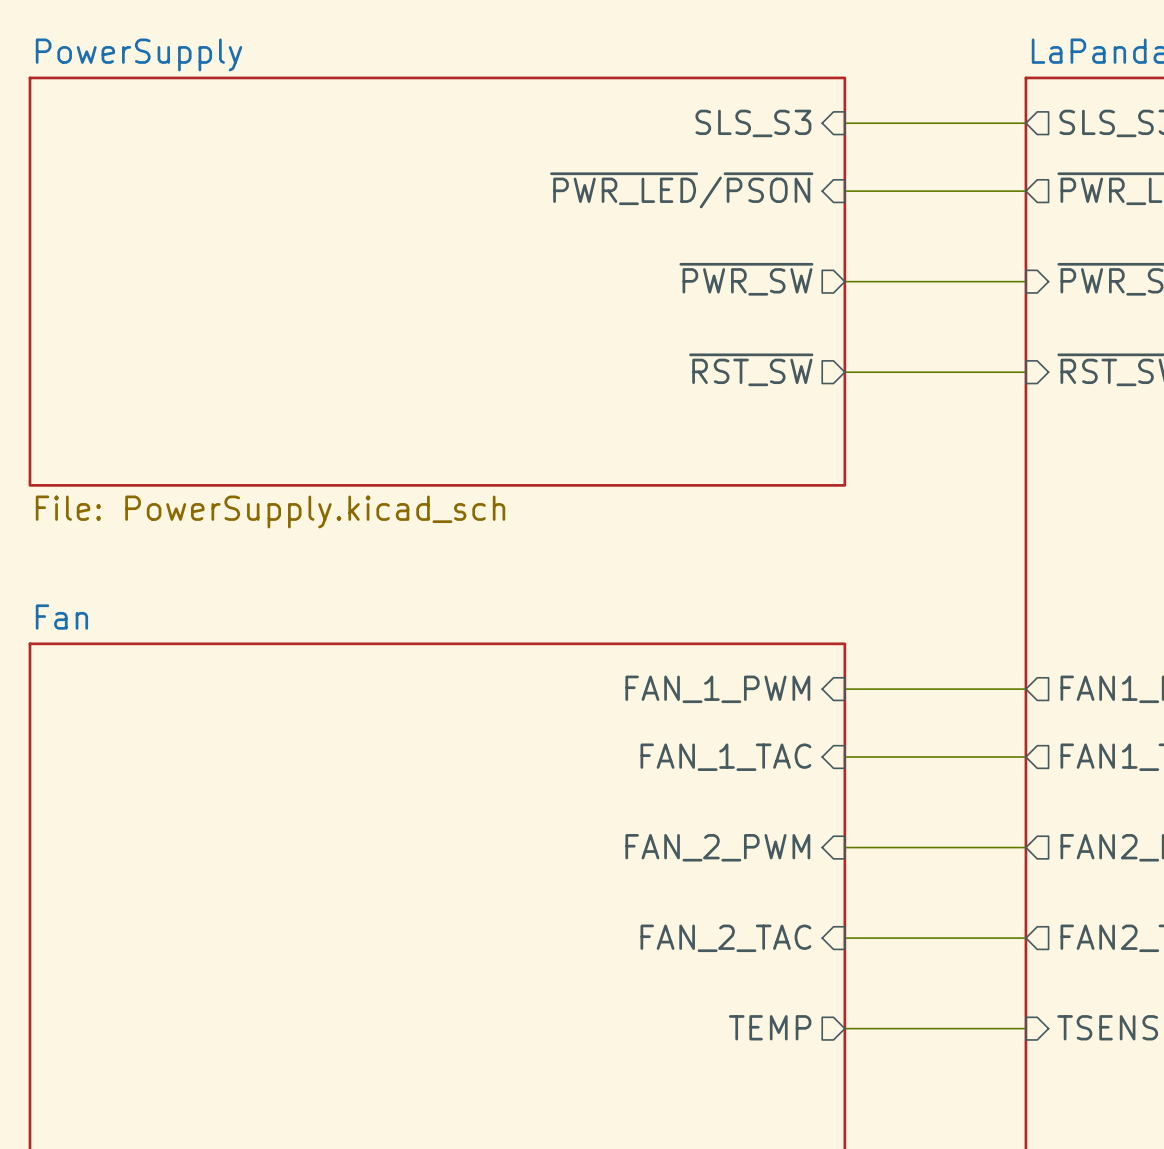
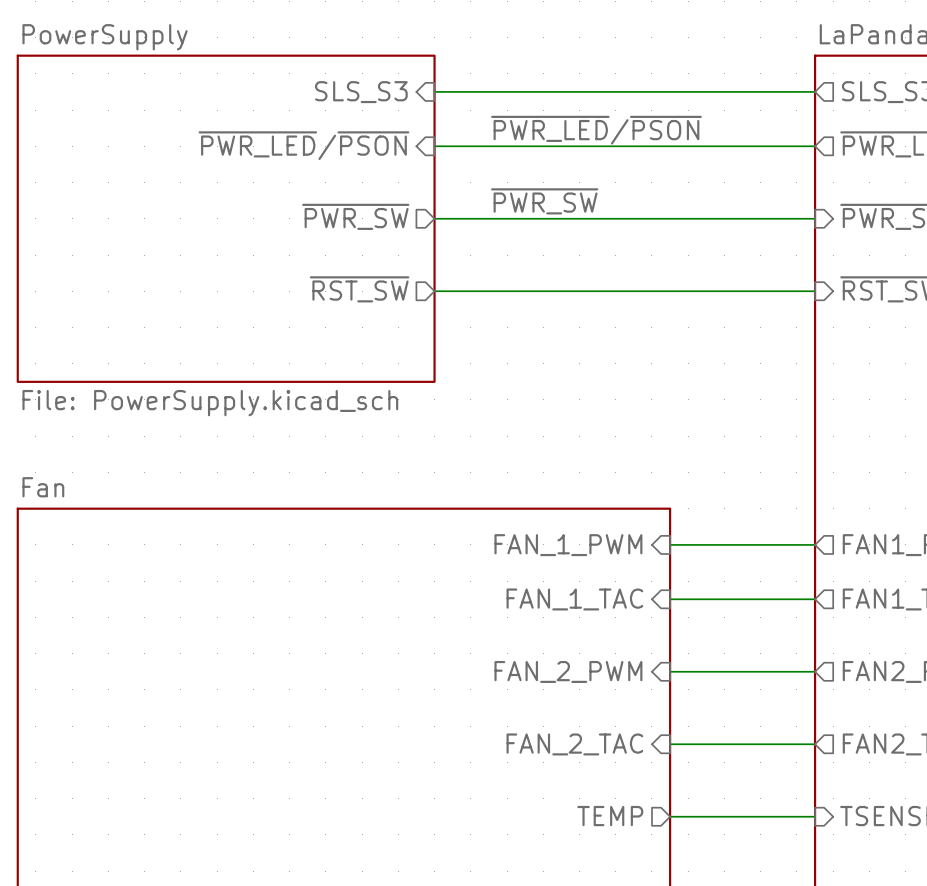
wire: none -> (434, 91) (670, 91)
sheet pin position: SLS_S3 (753, 123) -> SLS_S3 (361, 92)
label: none -> ~{PWR_LED}/~{PSON} (596, 130)
sheet pin position: ~{PWR_LED}/~{PSON} (681, 190) -> ~{PWR_LED}/~{PSON} (303, 145)
wire: none -> (434, 146) (670, 146)
label: none -> ~{PWR_SW} (544, 201)
sheet pin position: ~{PWR_SW} (746, 279) -> ~{PWR_SW} (355, 216)
sheet PowerSupply: none -> File: PowerSupply.kicad_sch (226, 218)
sheet PowerSupply: File: PowerSupply.kicad_sch (437, 281) -> none
wire: none -> (434, 218) (670, 218)
sheet pin position: ~{RST_SW} (751, 369) -> ~{RST_SW} (359, 289)
wire: none -> (434, 291) (670, 291)

